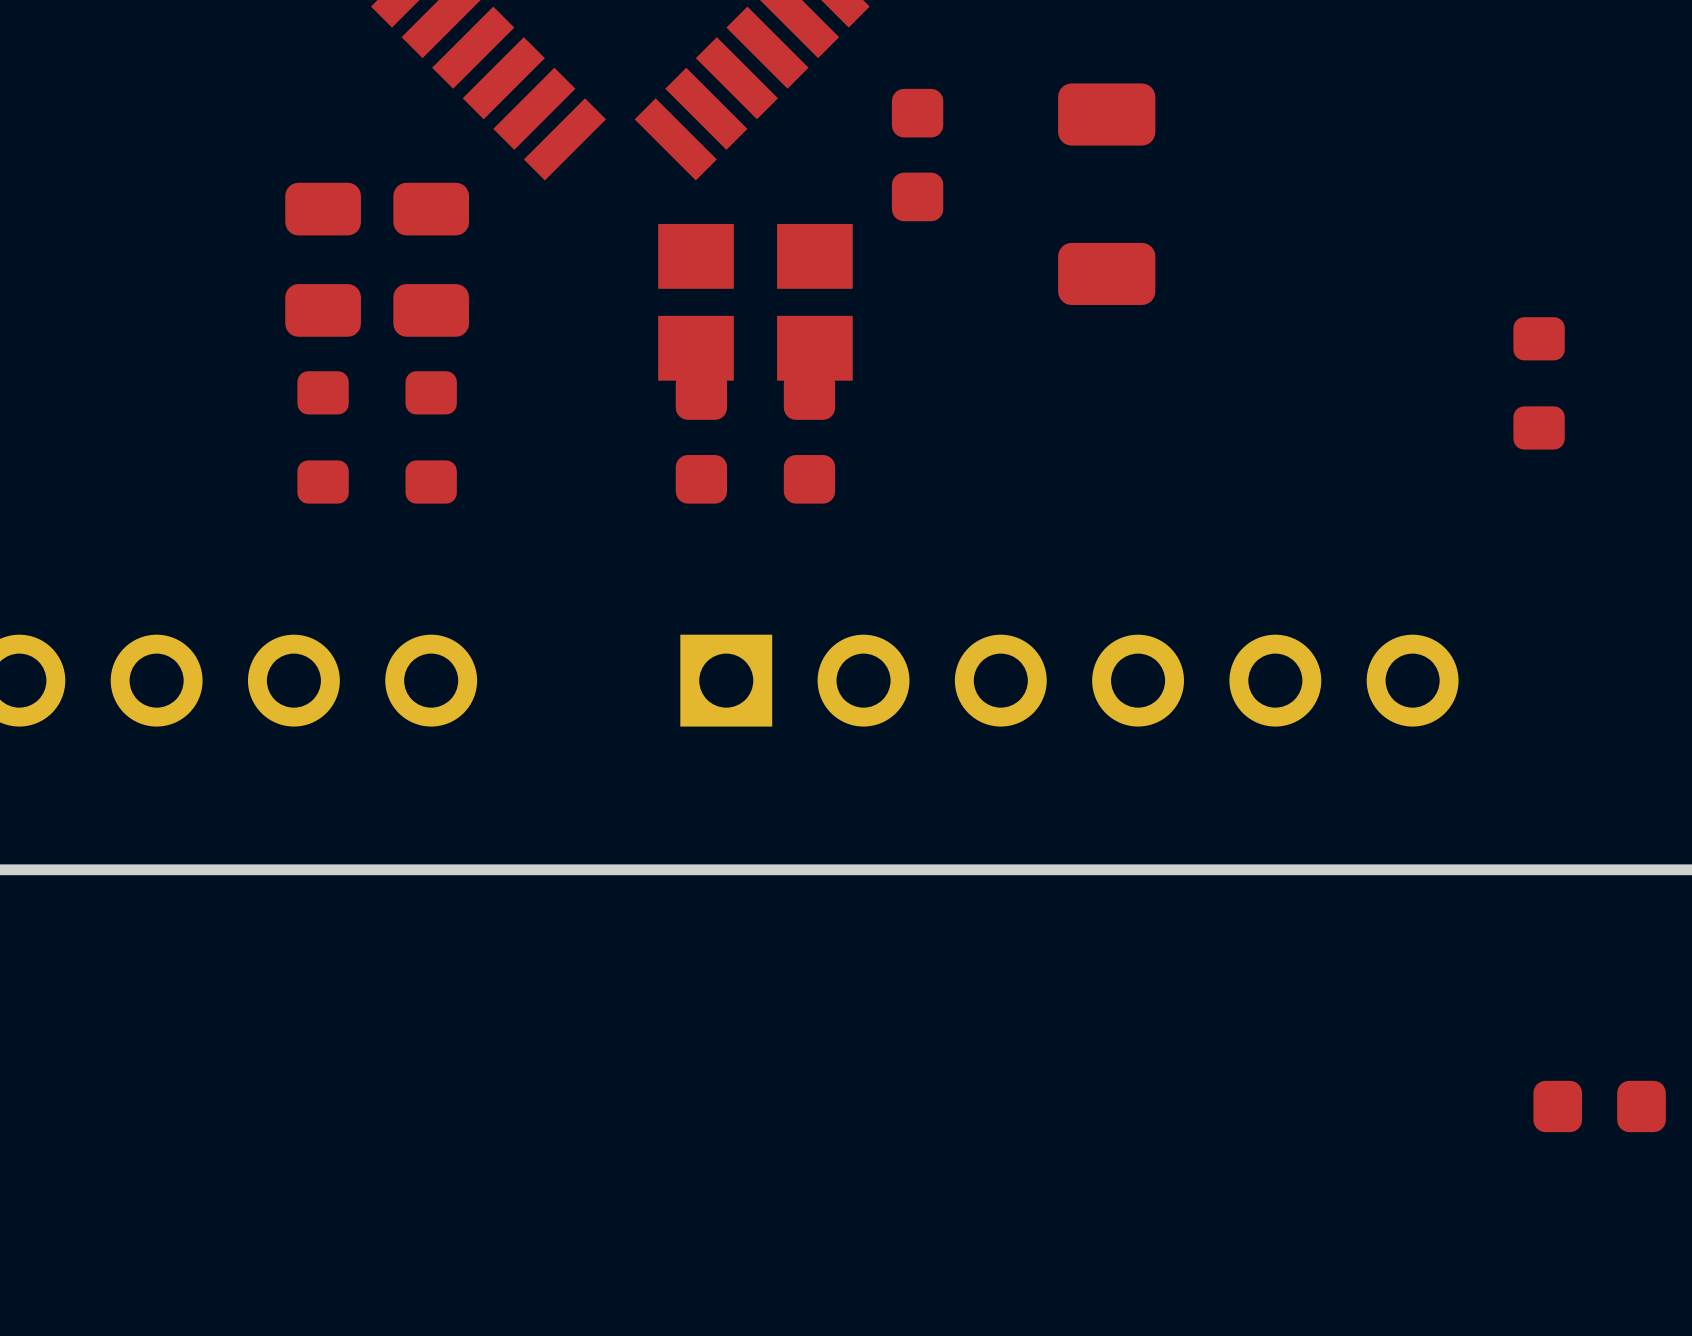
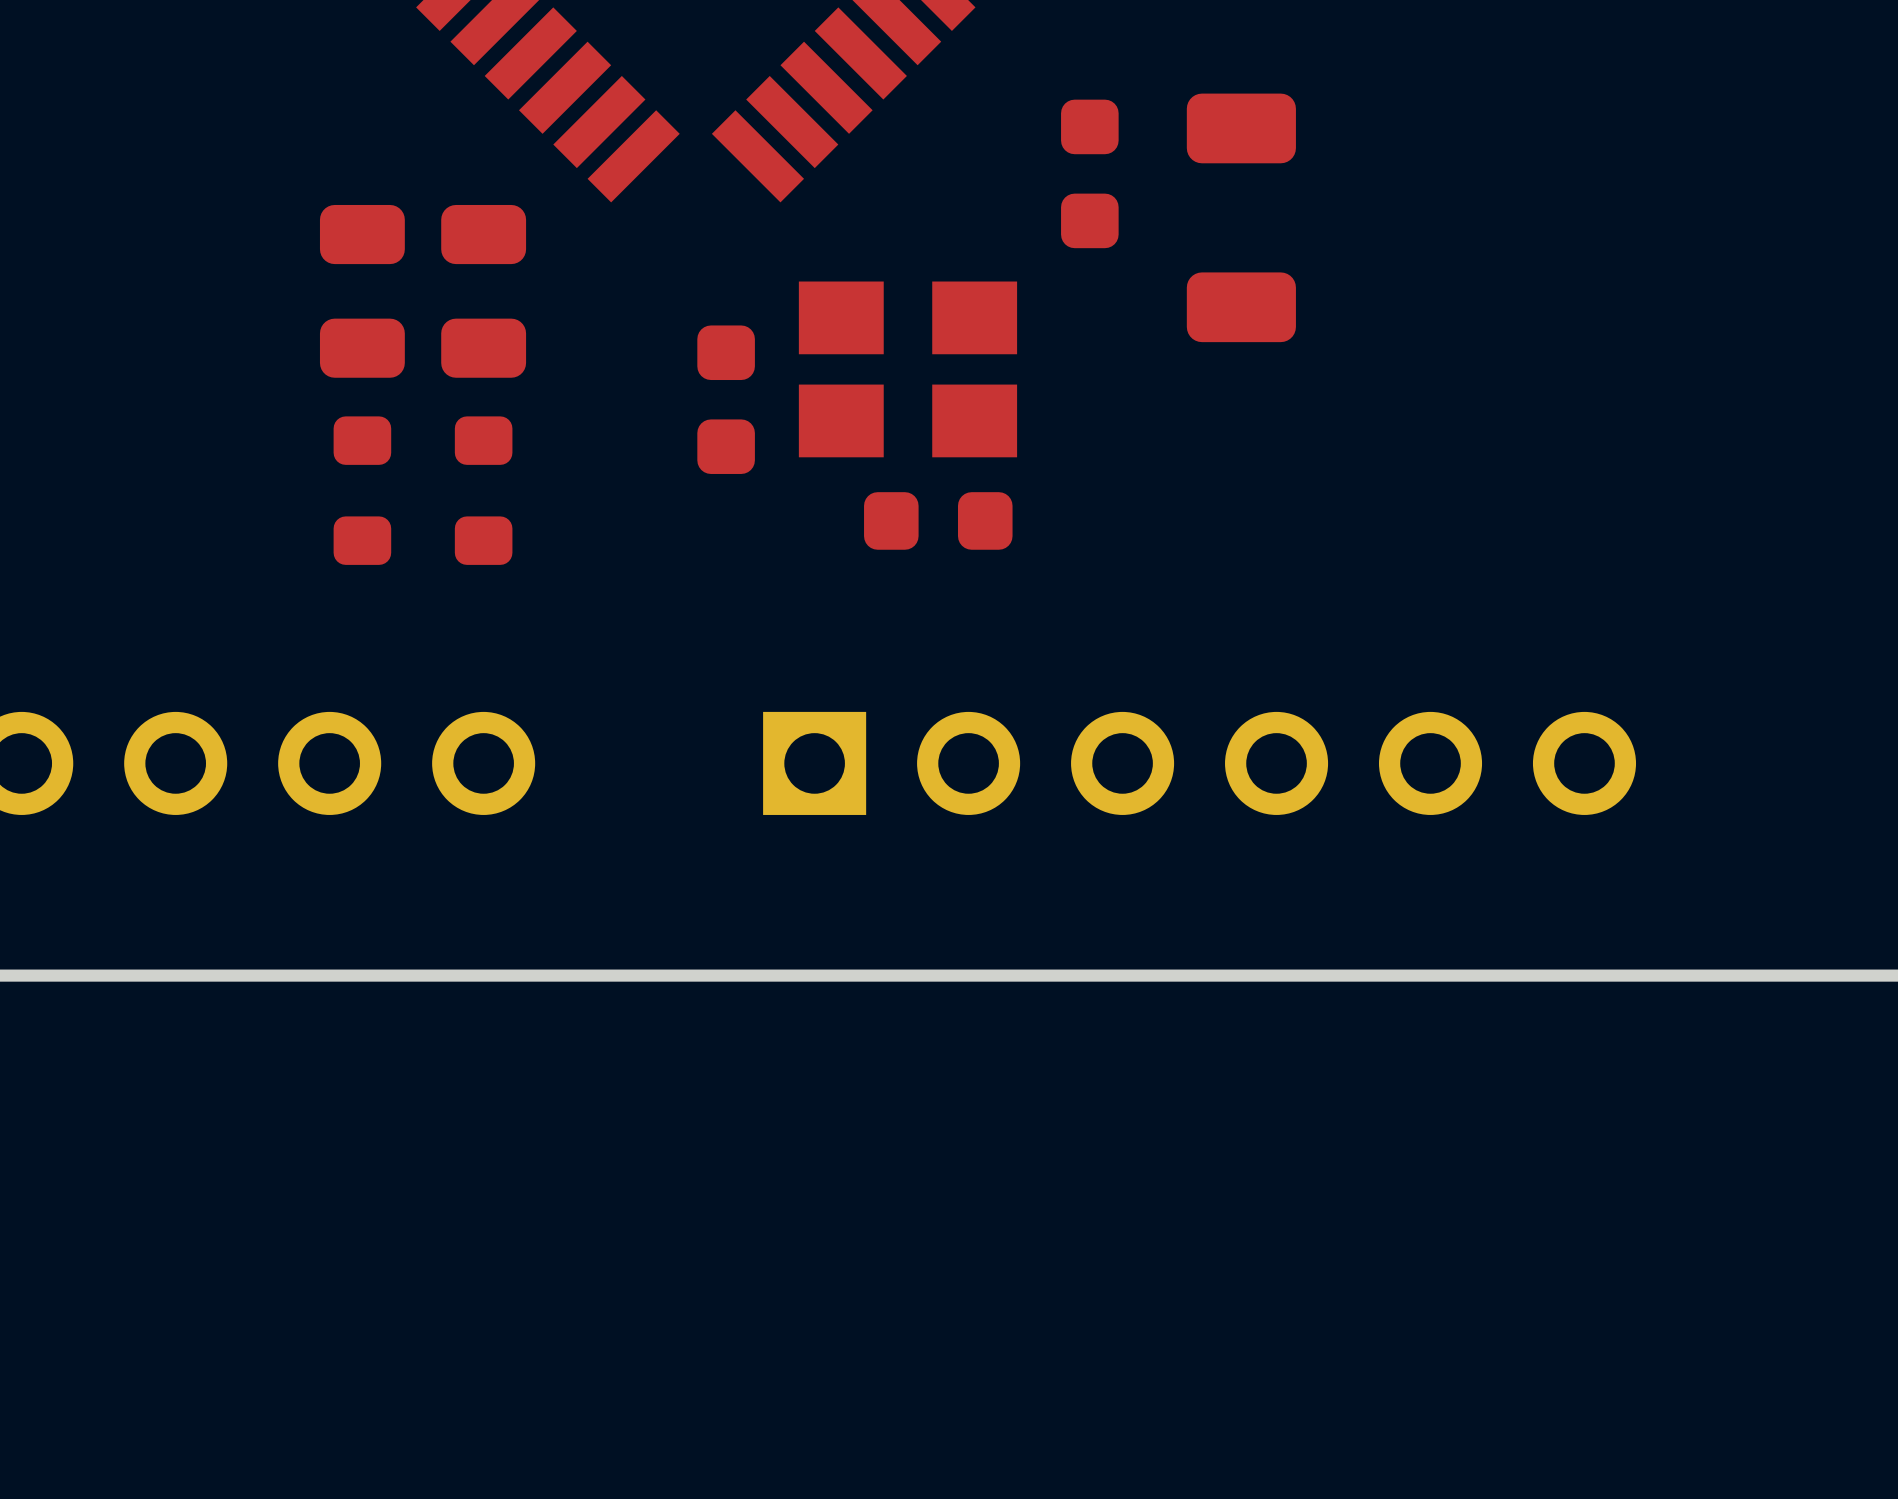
part position: (917, 155) -> (1089, 173)
part position: (755, 302) -> (907, 369)
part: (1539, 383) -> none
part position: (701, 437) -> (726, 399)
part rotation: 0° (809, 437) -> 90° clockwise (938, 520)
part: (1599, 1106) -> none

